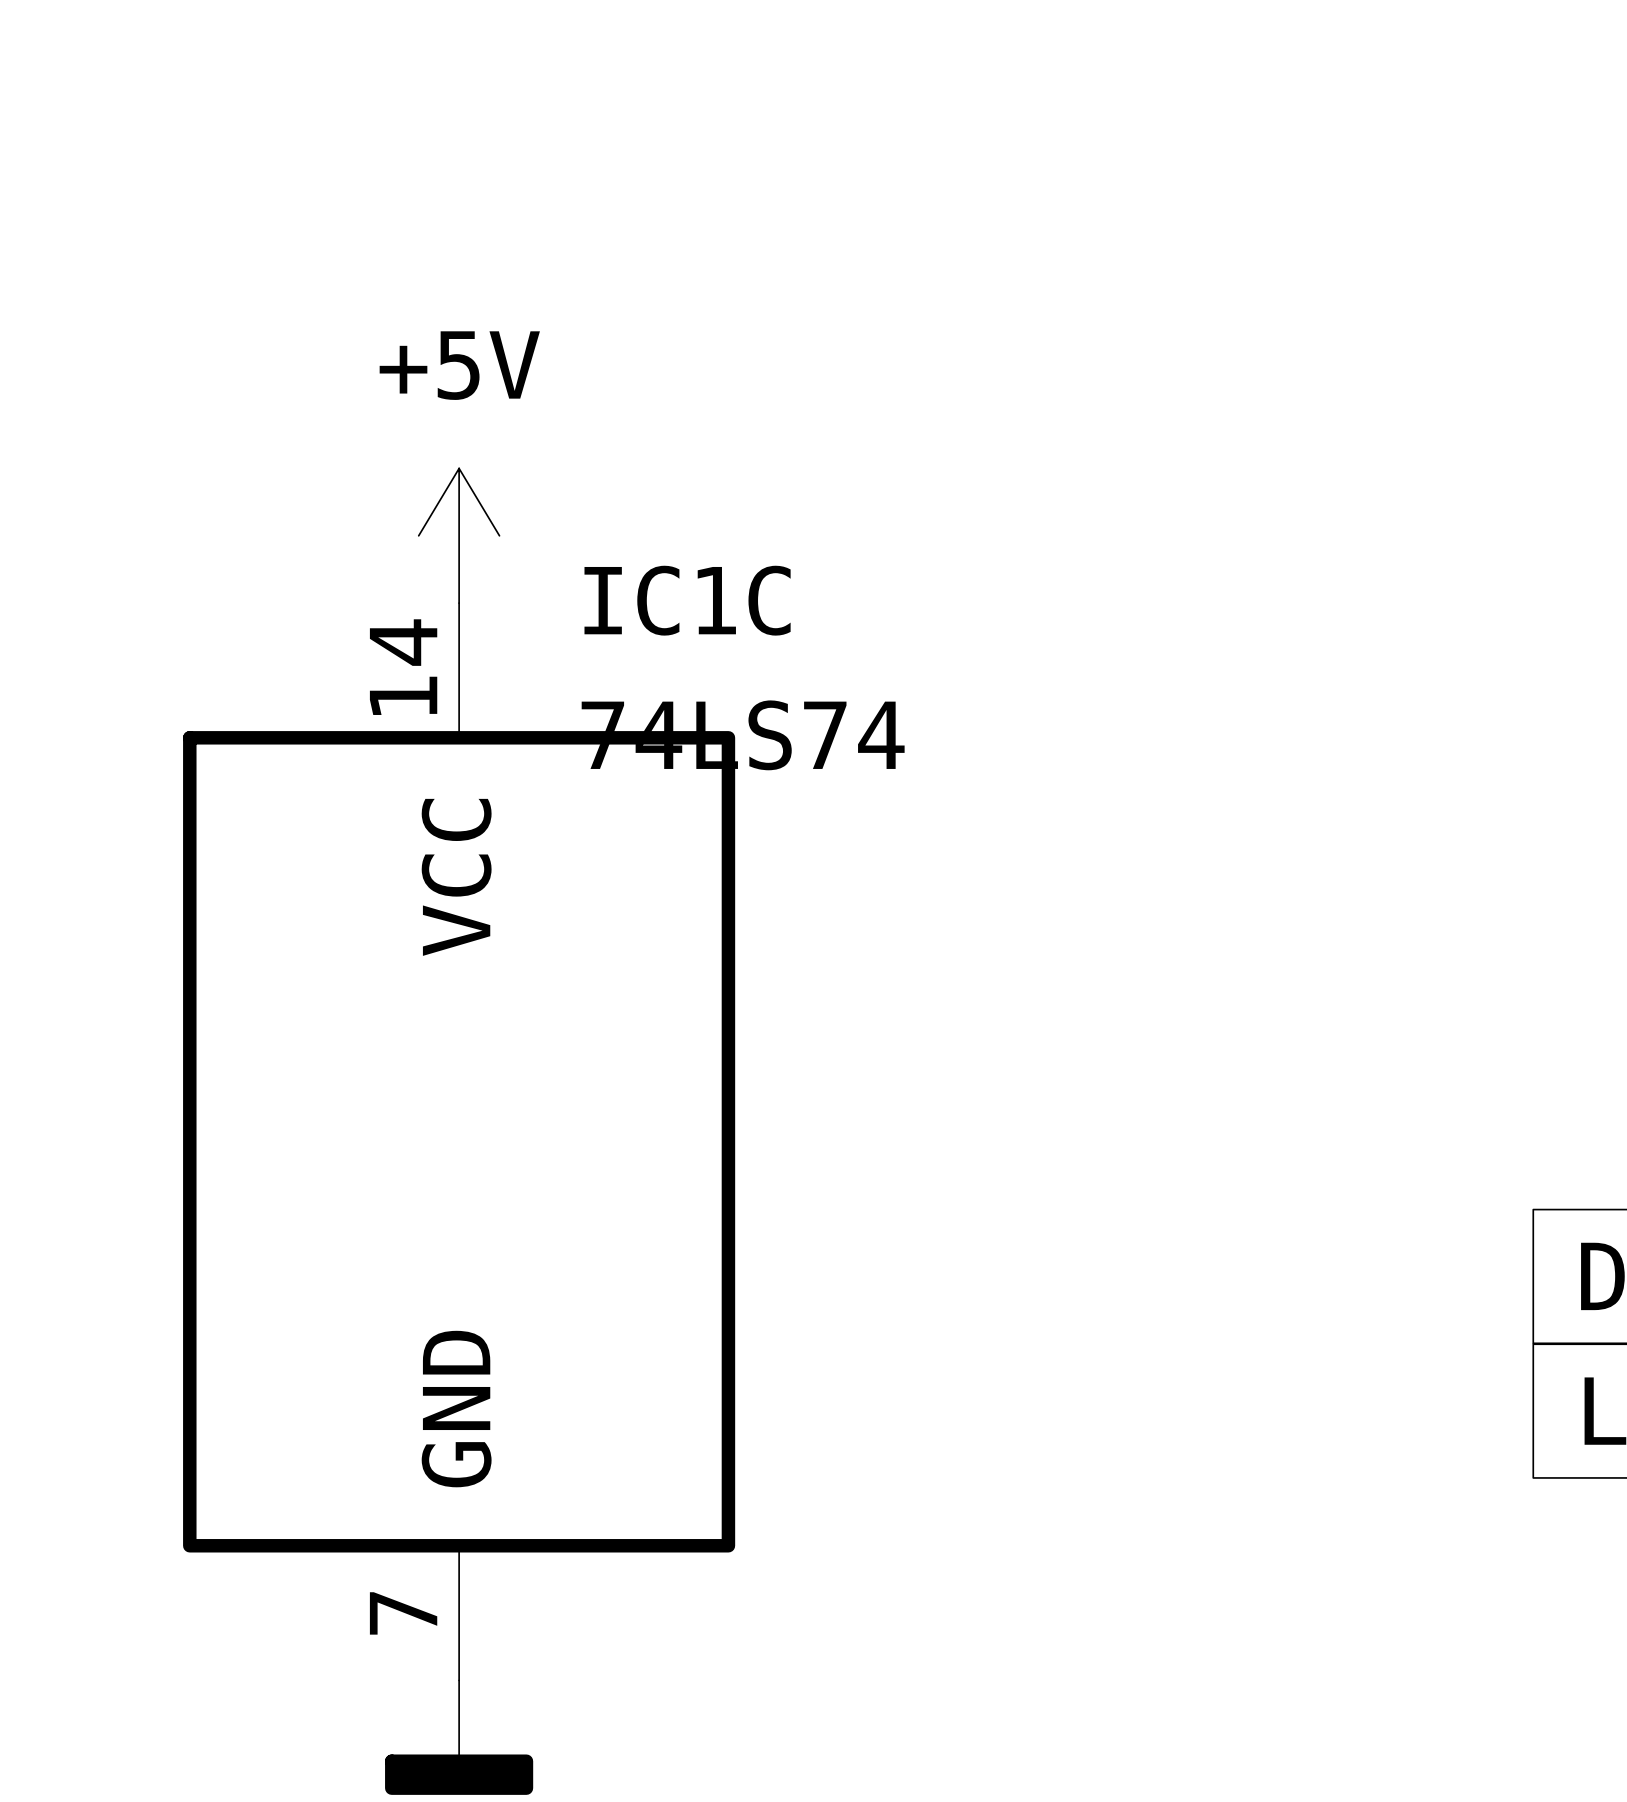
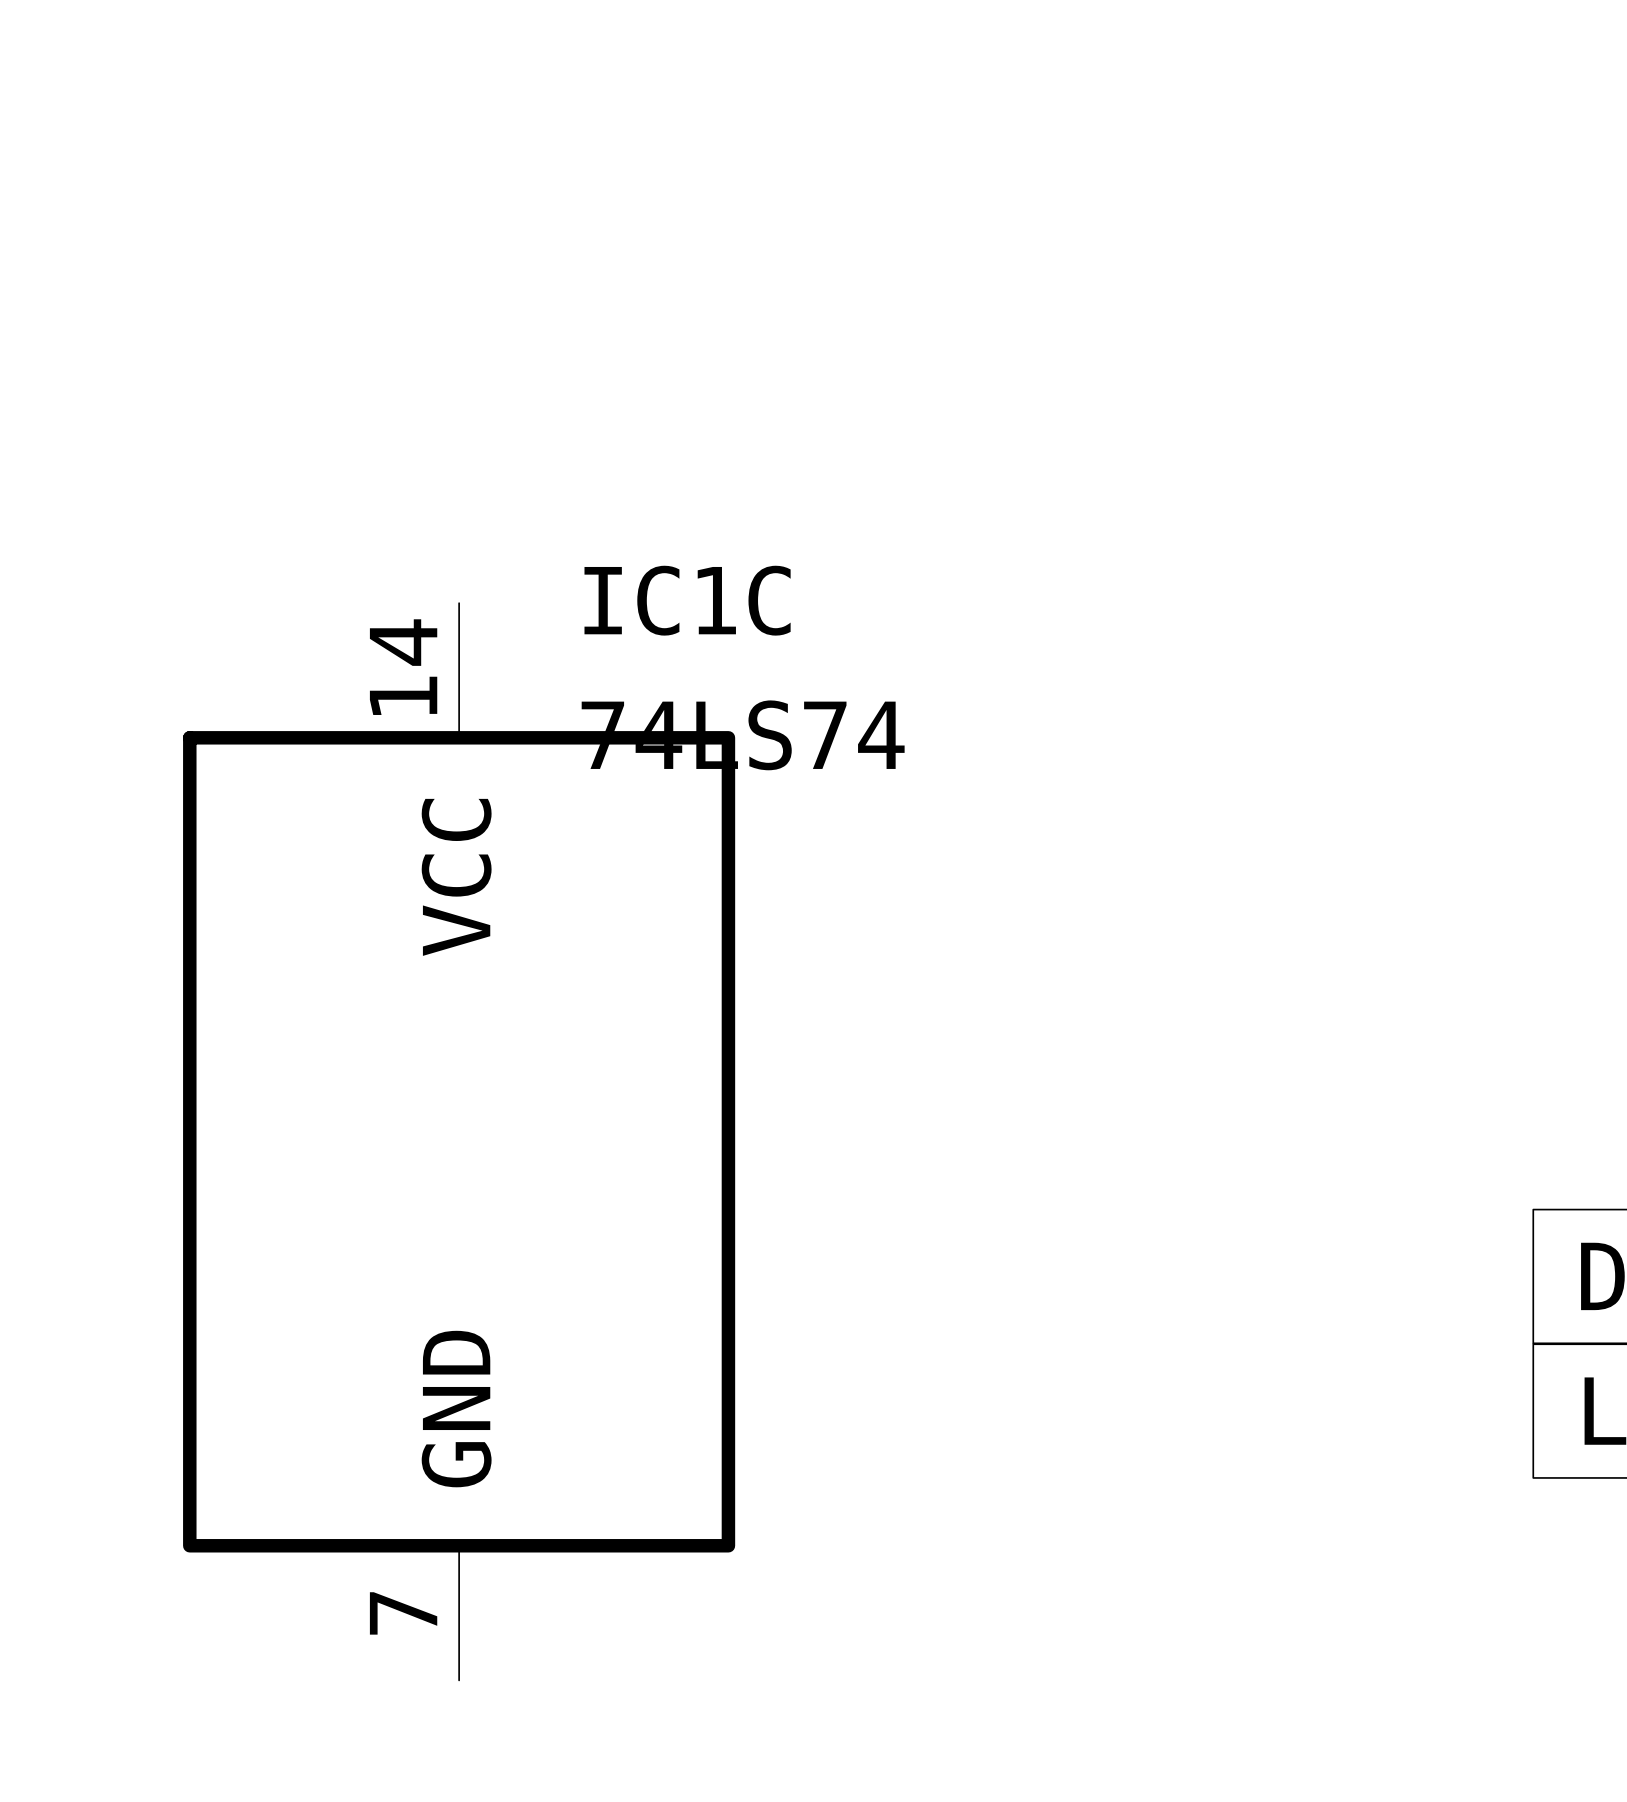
power symbol: +5V (459, 535) -> none
power symbol: (459, 1737) -> none

